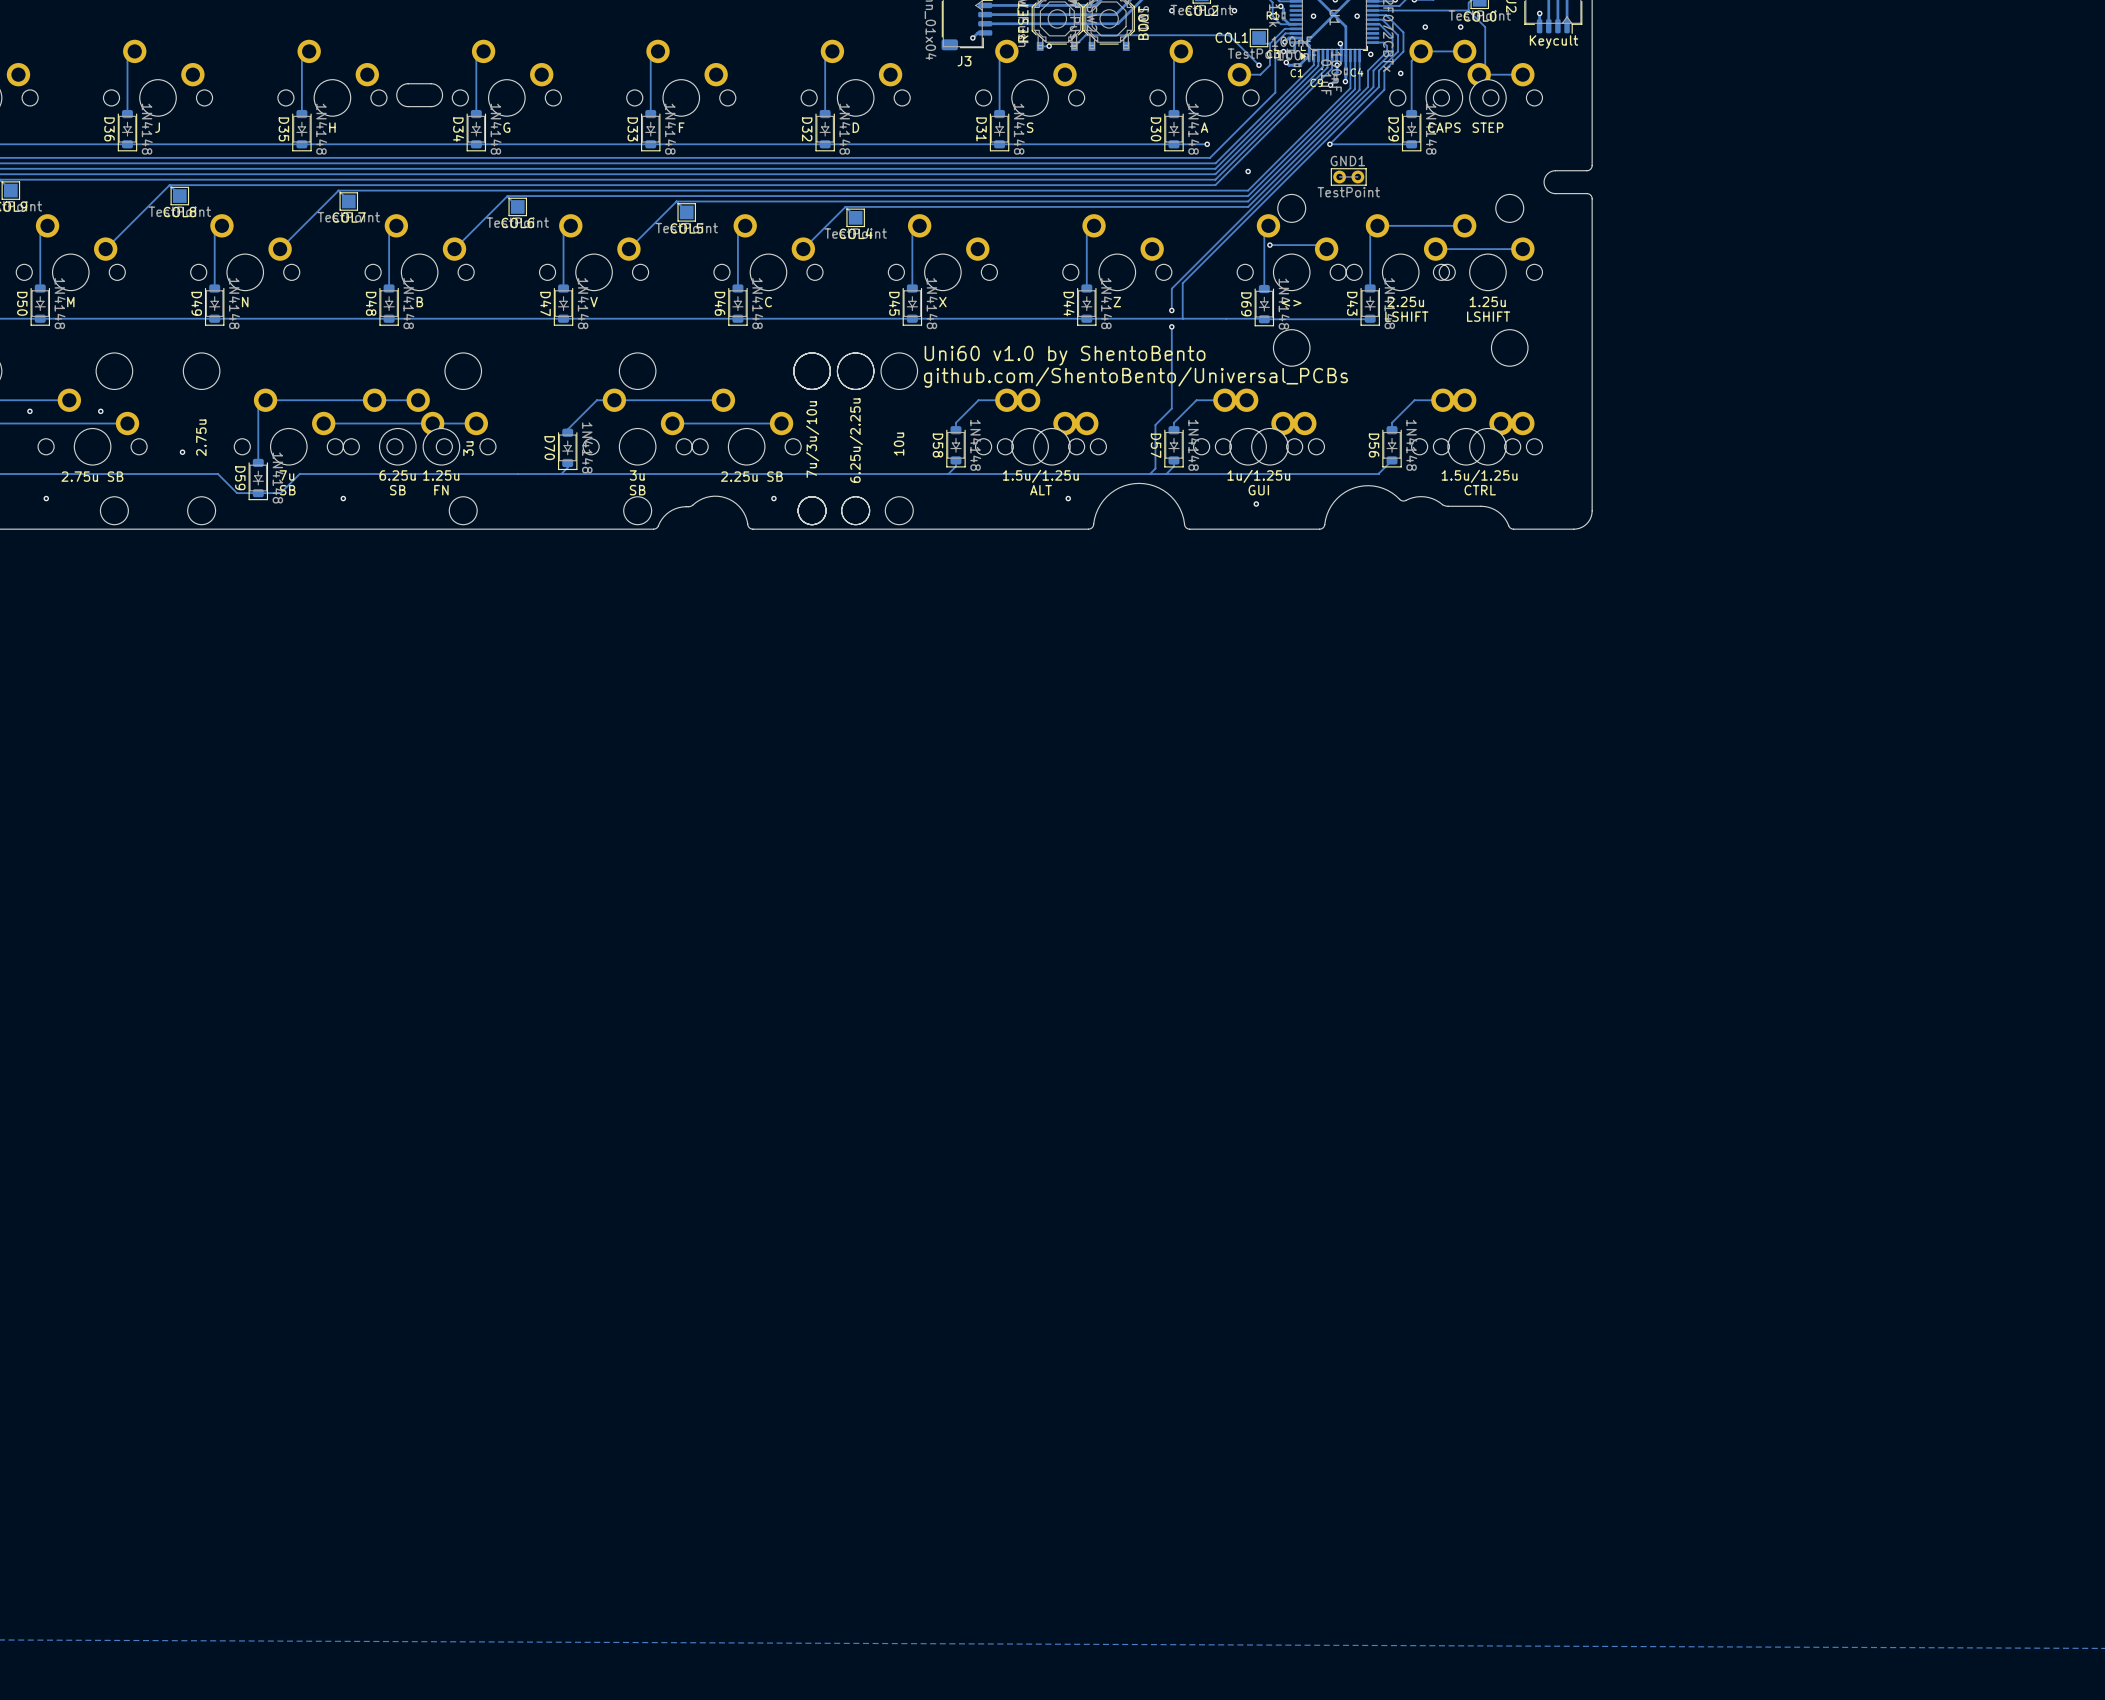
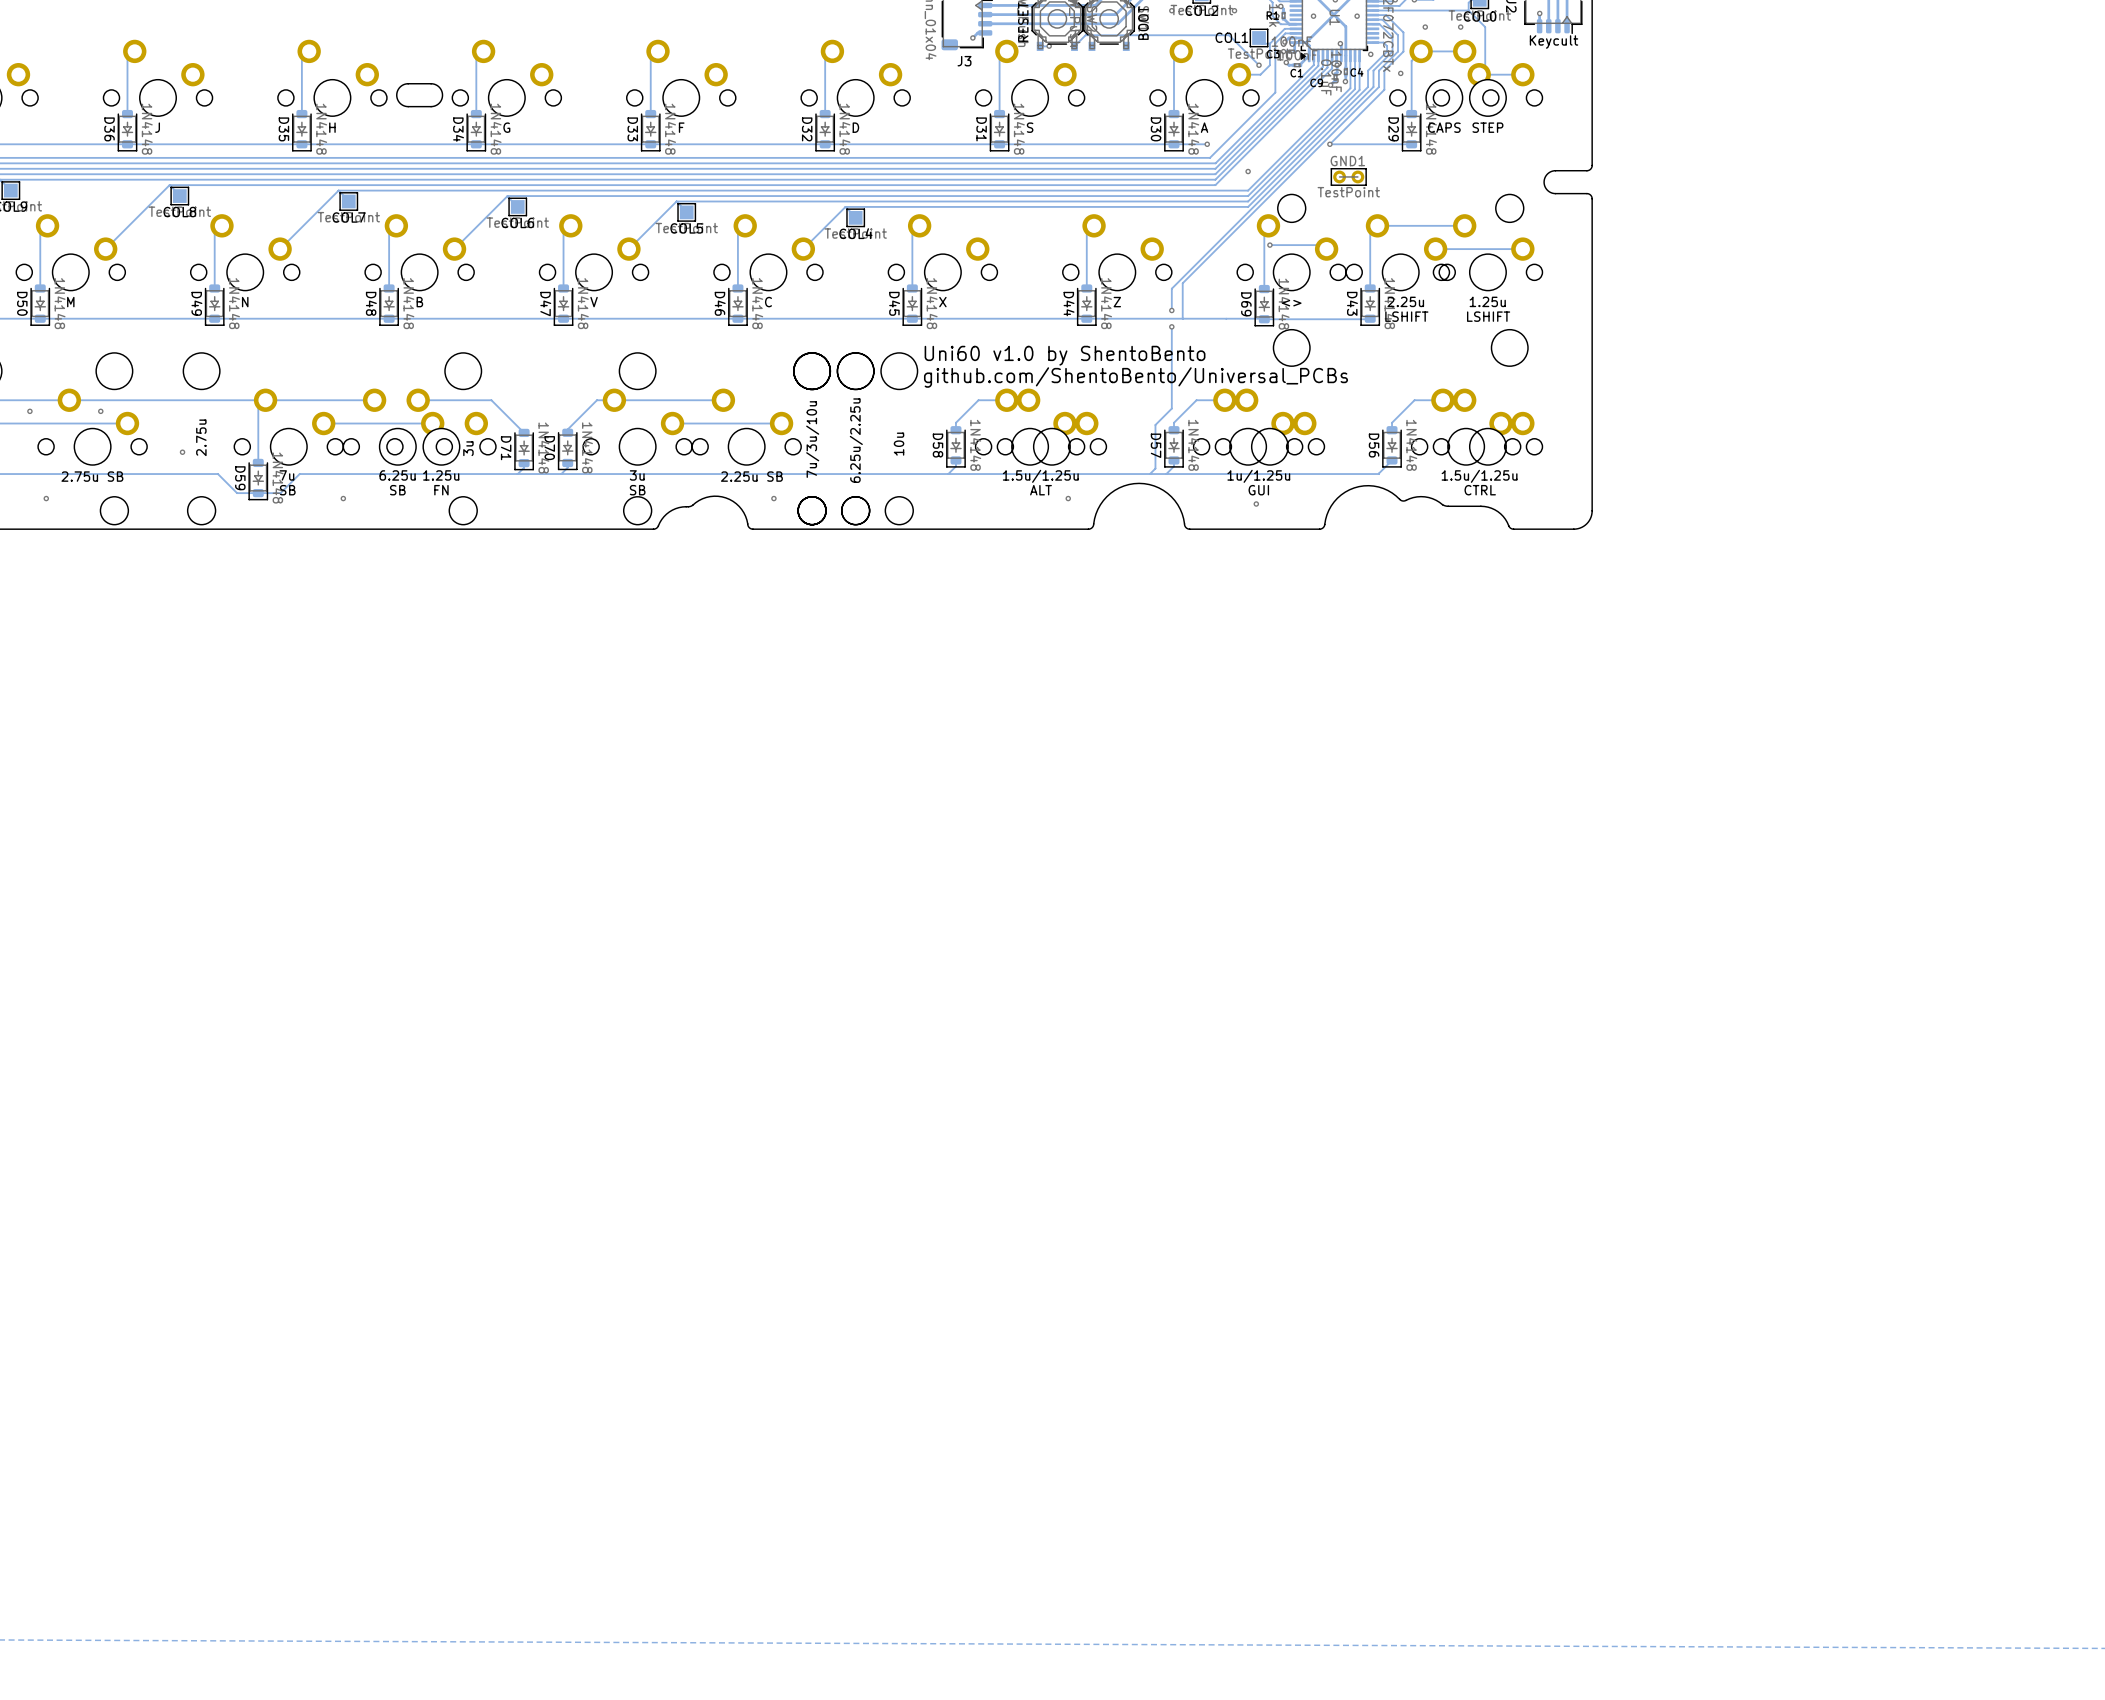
track: none -> (265, 400) (69, 400)
track: (418, 400) (374, 400) -> (418, 400) (491, 400) (524, 432)
track: (476, 423) (432, 423) -> none
D71: none -> 1N4148 (524, 449)
track: none -> (524, 463) (524, 467) (517, 474)

